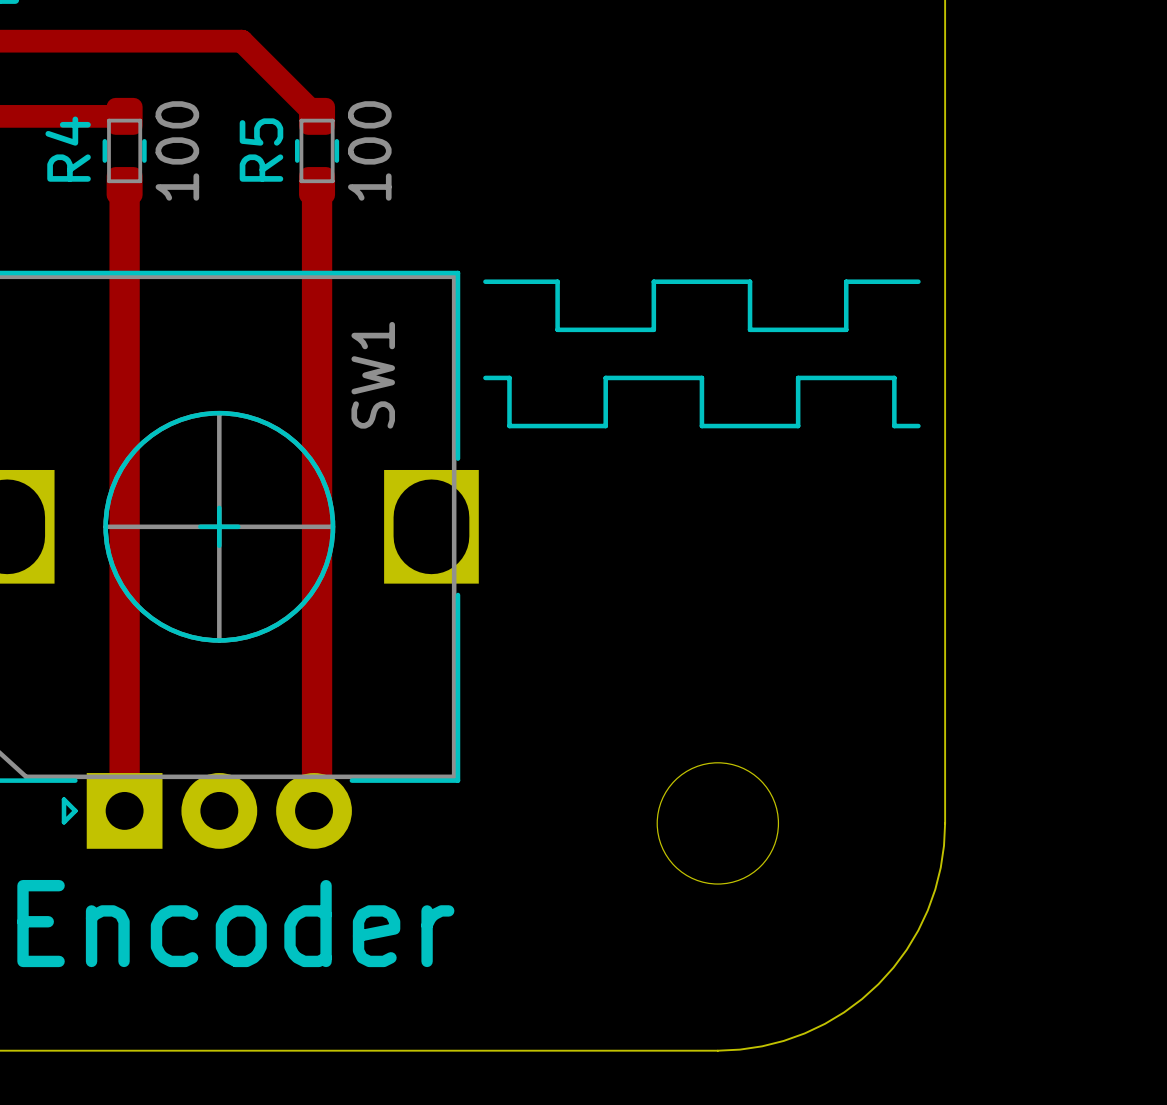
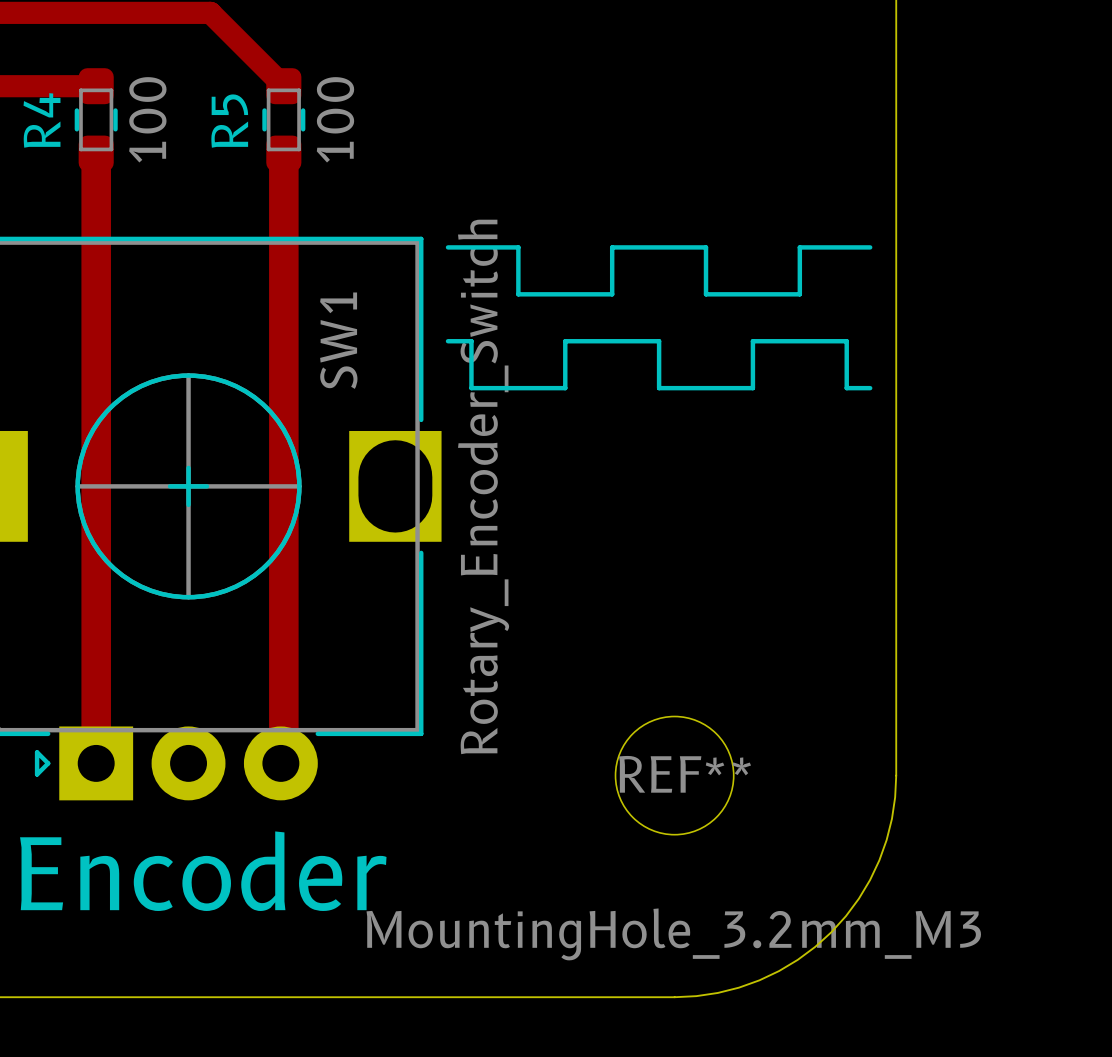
SW1 value: none -> Rotary_Encoder_Switch (483, 486)
REF** name: none -> REF** (685, 774)
REF** value: none -> MountingHole_3.2mm_M3 (673, 934)

